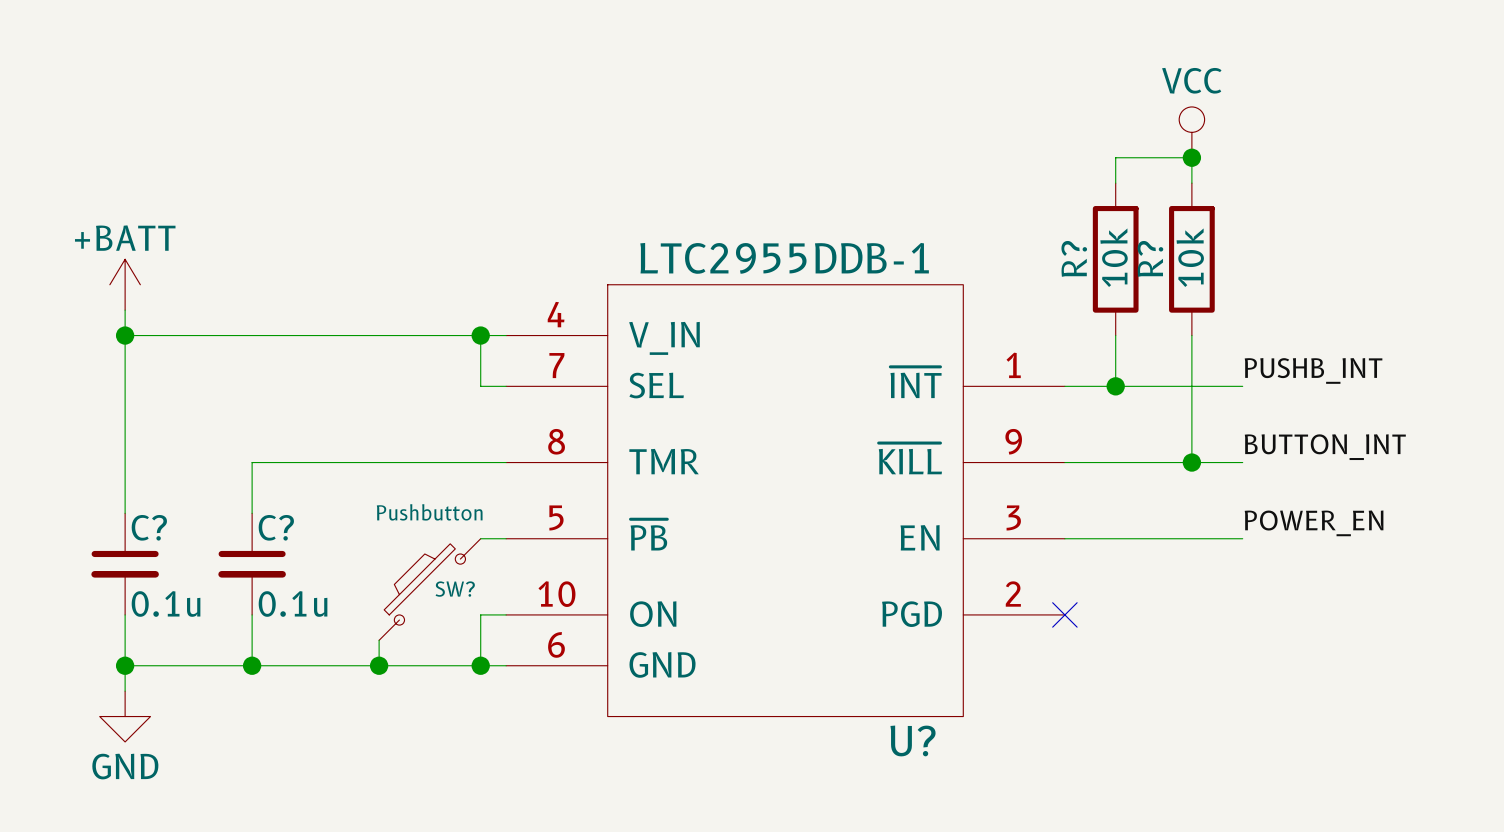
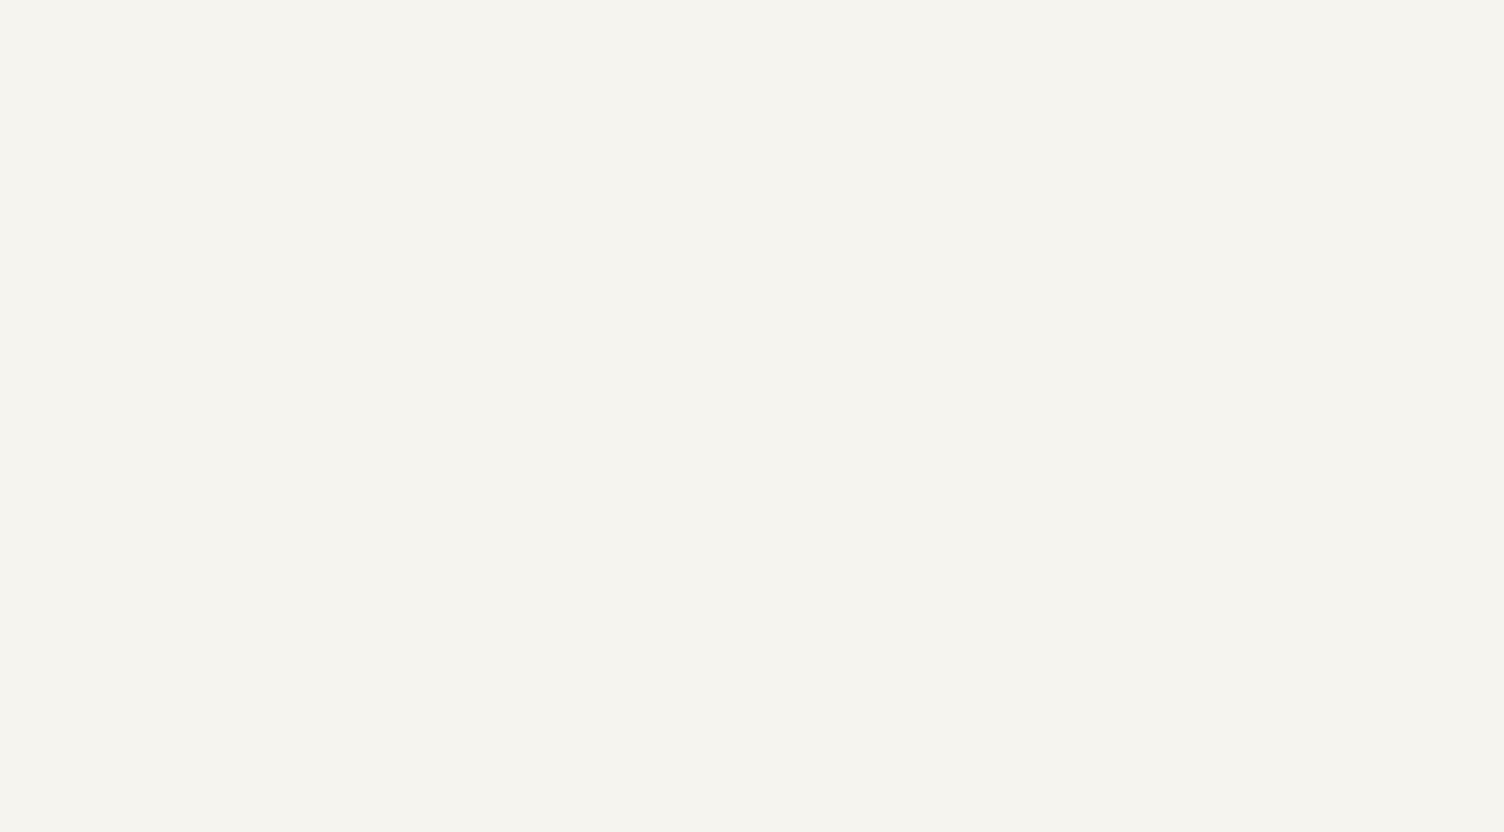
power symbol: VCC (1191, 132) -> none
junction: (1191, 157) -> none
wire: (1115, 183) (1115, 157) (1191, 157) (1191, 183) -> none
R?: 10k (1115, 259) -> none
R?: 10k (1191, 259) -> none
power symbol: +BATT (125, 284) -> none
wire: (125, 310) (125, 513) -> none
wire: (125, 335) (506, 335) -> none
junction: (125, 335) -> none
wire: (480, 335) (480, 386) (506, 386) -> none
junction: (480, 335) -> none
wire: (1115, 335) (1115, 386) -> none
wire: (1191, 335) (1191, 462) -> none
label: PUSHB_INT (1313, 370) -> none
wire: (1064, 386) (1242, 386) -> none
junction: (1115, 386) -> none
label: BUTTON_INT (1325, 447) -> none
wire: (506, 462) (252, 462) (252, 513) -> none
wire: (1064, 462) (1242, 462) -> none
junction: (1191, 462) -> none
U?: LTC2955DDB-1 (785, 500) -> none
label: POWER_EN (1314, 523) -> none
wire: (480, 538) (506, 538) -> none
wire: (1064, 538) (1242, 538) -> none
C?: 0.1u (125, 564) -> none
C?: 0.1u (252, 564) -> none
SW?: Pushbutton (429, 589) -> none
wire: (125, 614) (125, 691) -> none
wire: (252, 614) (252, 665) -> none
wire: (506, 614) (480, 614) (480, 665) -> none
no-connect mark: (1064, 614) -> none
wire: (379, 640) (379, 665) -> none
wire: (125, 665) (506, 665) -> none
junction: (125, 665) -> none
junction: (252, 665) -> none
junction: (379, 665) -> none
junction: (480, 665) -> none
power symbol: GND (125, 716) -> none

